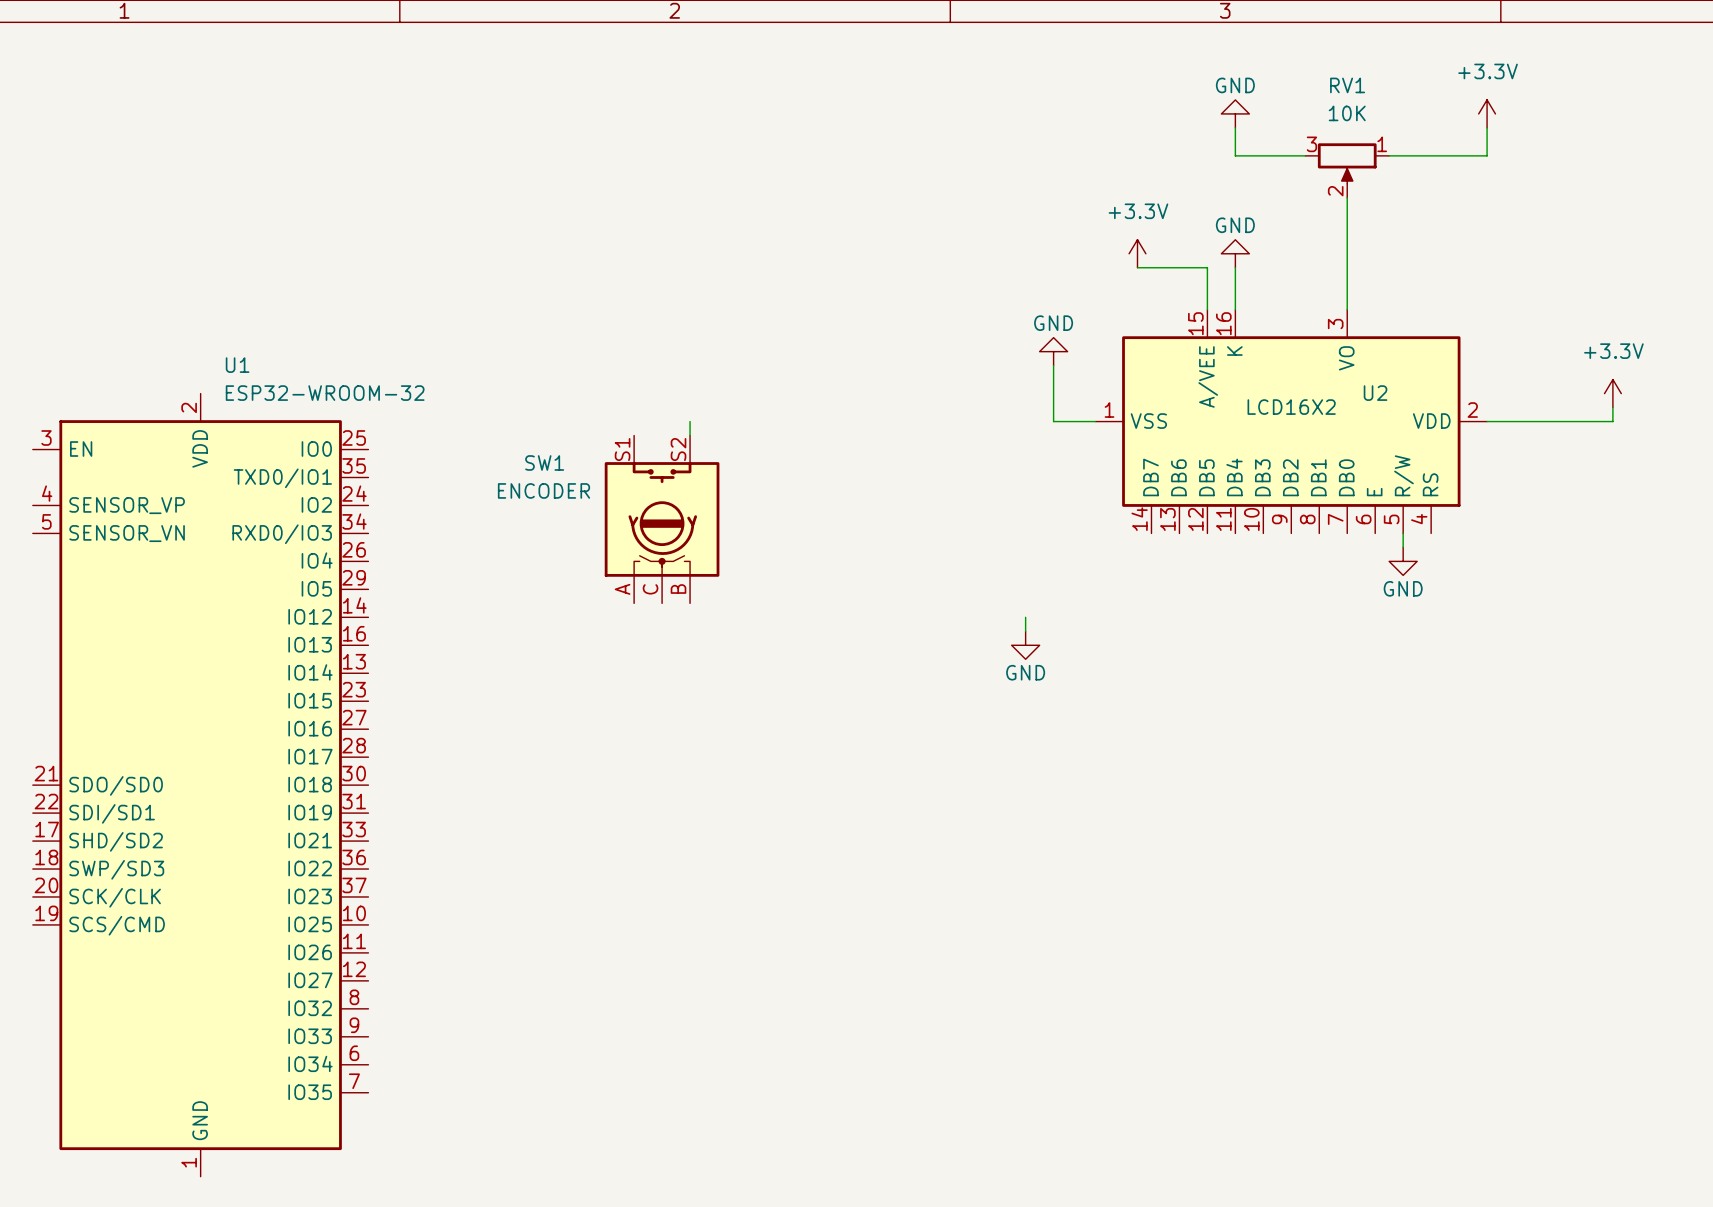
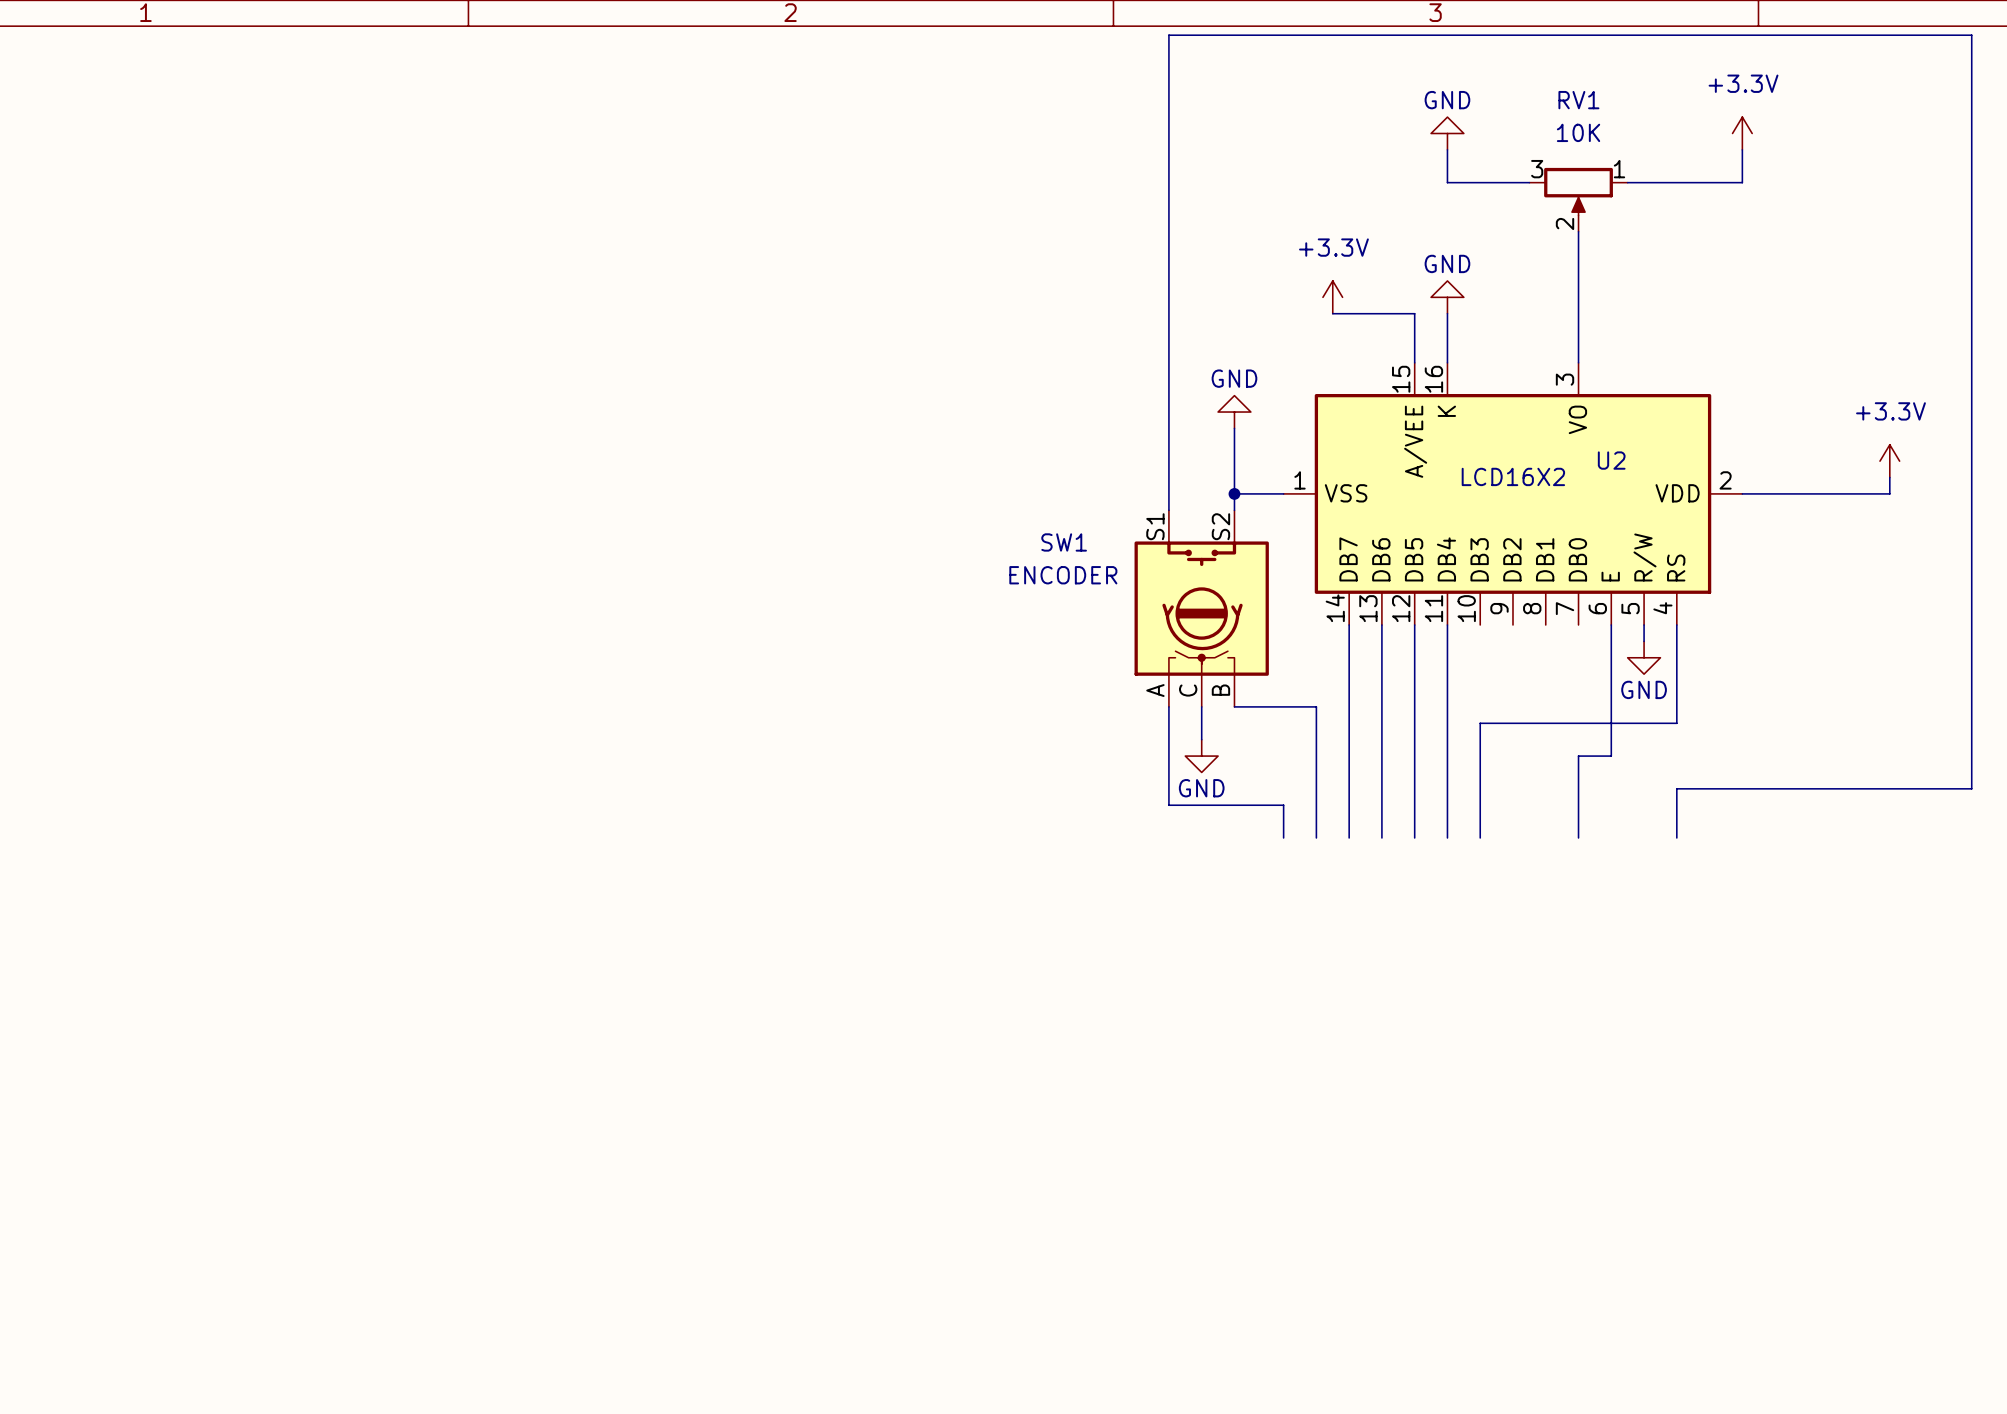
wire: (690, 421) (690, 435) -> none
wire: none -> (1234, 493) (1234, 510)
junction: none -> (1234, 493)
wire: none -> (1168, 510) (1168, 35) (1971, 35) (1971, 788) (1676, 788) (1676, 837)
SW1 position: (662, 519) -> (1201, 608)
wire: none -> (1349, 625) (1349, 837)
wire: none -> (1381, 625) (1381, 837)
wire: none -> (1414, 625) (1414, 837)
wire: none -> (1447, 625) (1447, 837)
wire: none -> (1611, 625) (1611, 756) (1578, 756) (1578, 837)
wire: none -> (1676, 625) (1676, 723) (1480, 723) (1480, 837)
wire: none -> (1168, 706) (1168, 805) (1283, 805) (1283, 837)
wire: none -> (1201, 706) (1201, 723)
wire: none -> (1234, 706) (1316, 706) (1316, 837)
U1: ESP32-WROOM-32 (200, 785) -> none

